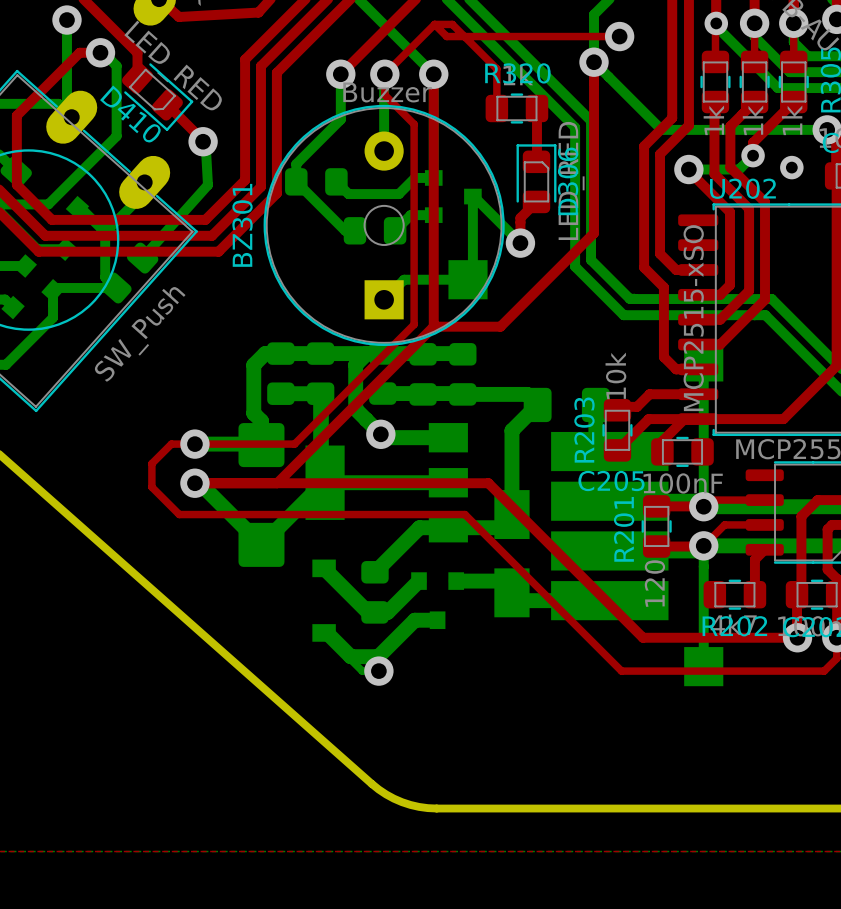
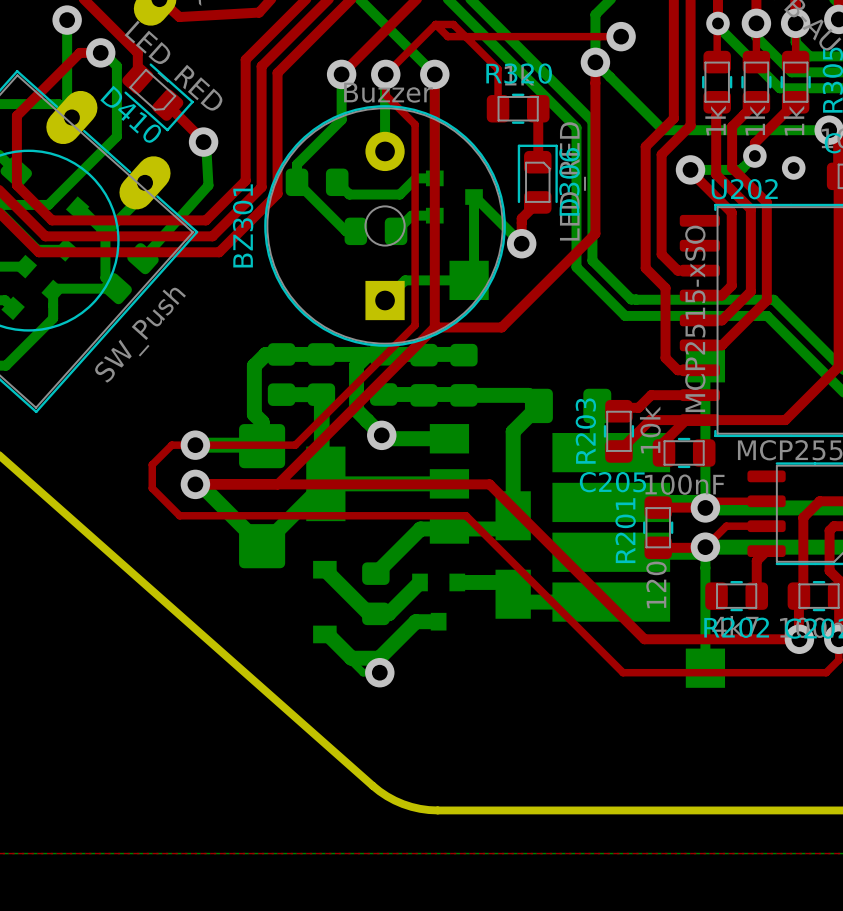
R203 value position: 10k (615, 375) -> 10k (650, 429)

